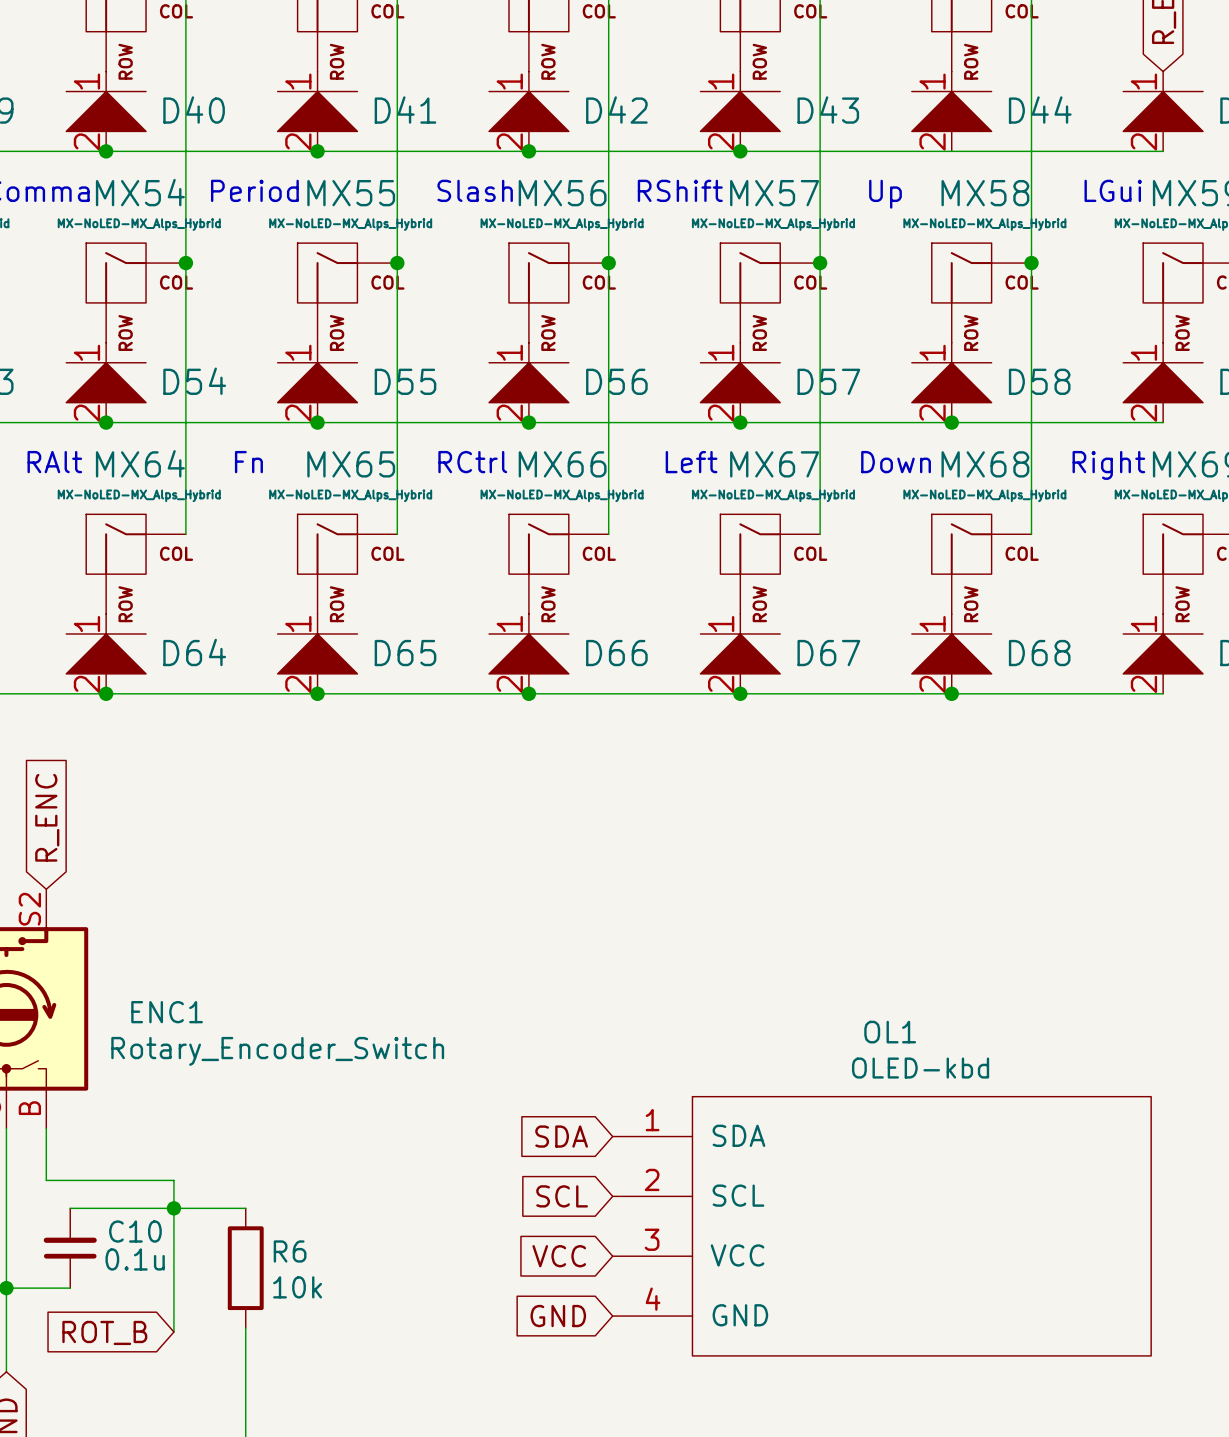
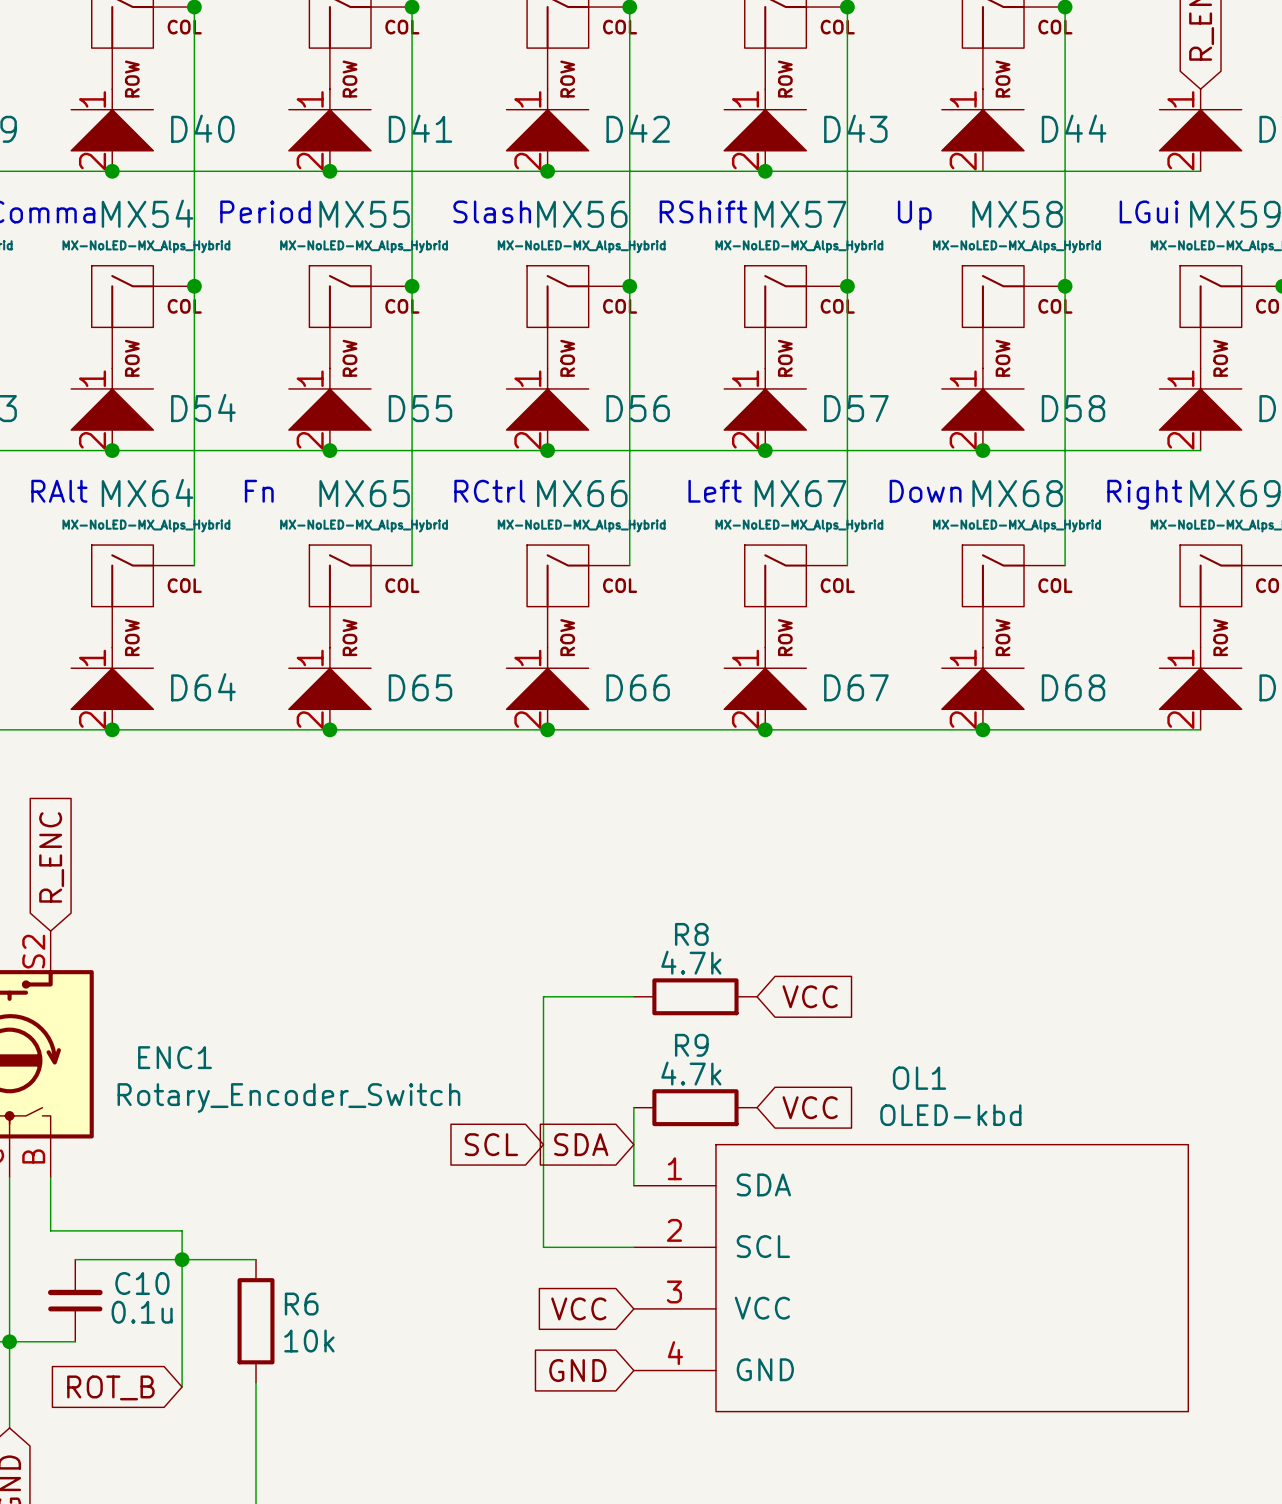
wire: none -> (633, 996) (543, 996) (543, 1247) (633, 1247)
R8: none -> 4.7k (695, 996)
global label: none -> VCC (810, 996)
wire: none -> (633, 1107) (633, 1185)
R9: none -> 4.7k (695, 1107)
global label: none -> VCC (810, 1107)
global label position: SDA (561, 1136) -> SDA (581, 1144)
global label position: SCL (562, 1196) -> SCL (491, 1144)

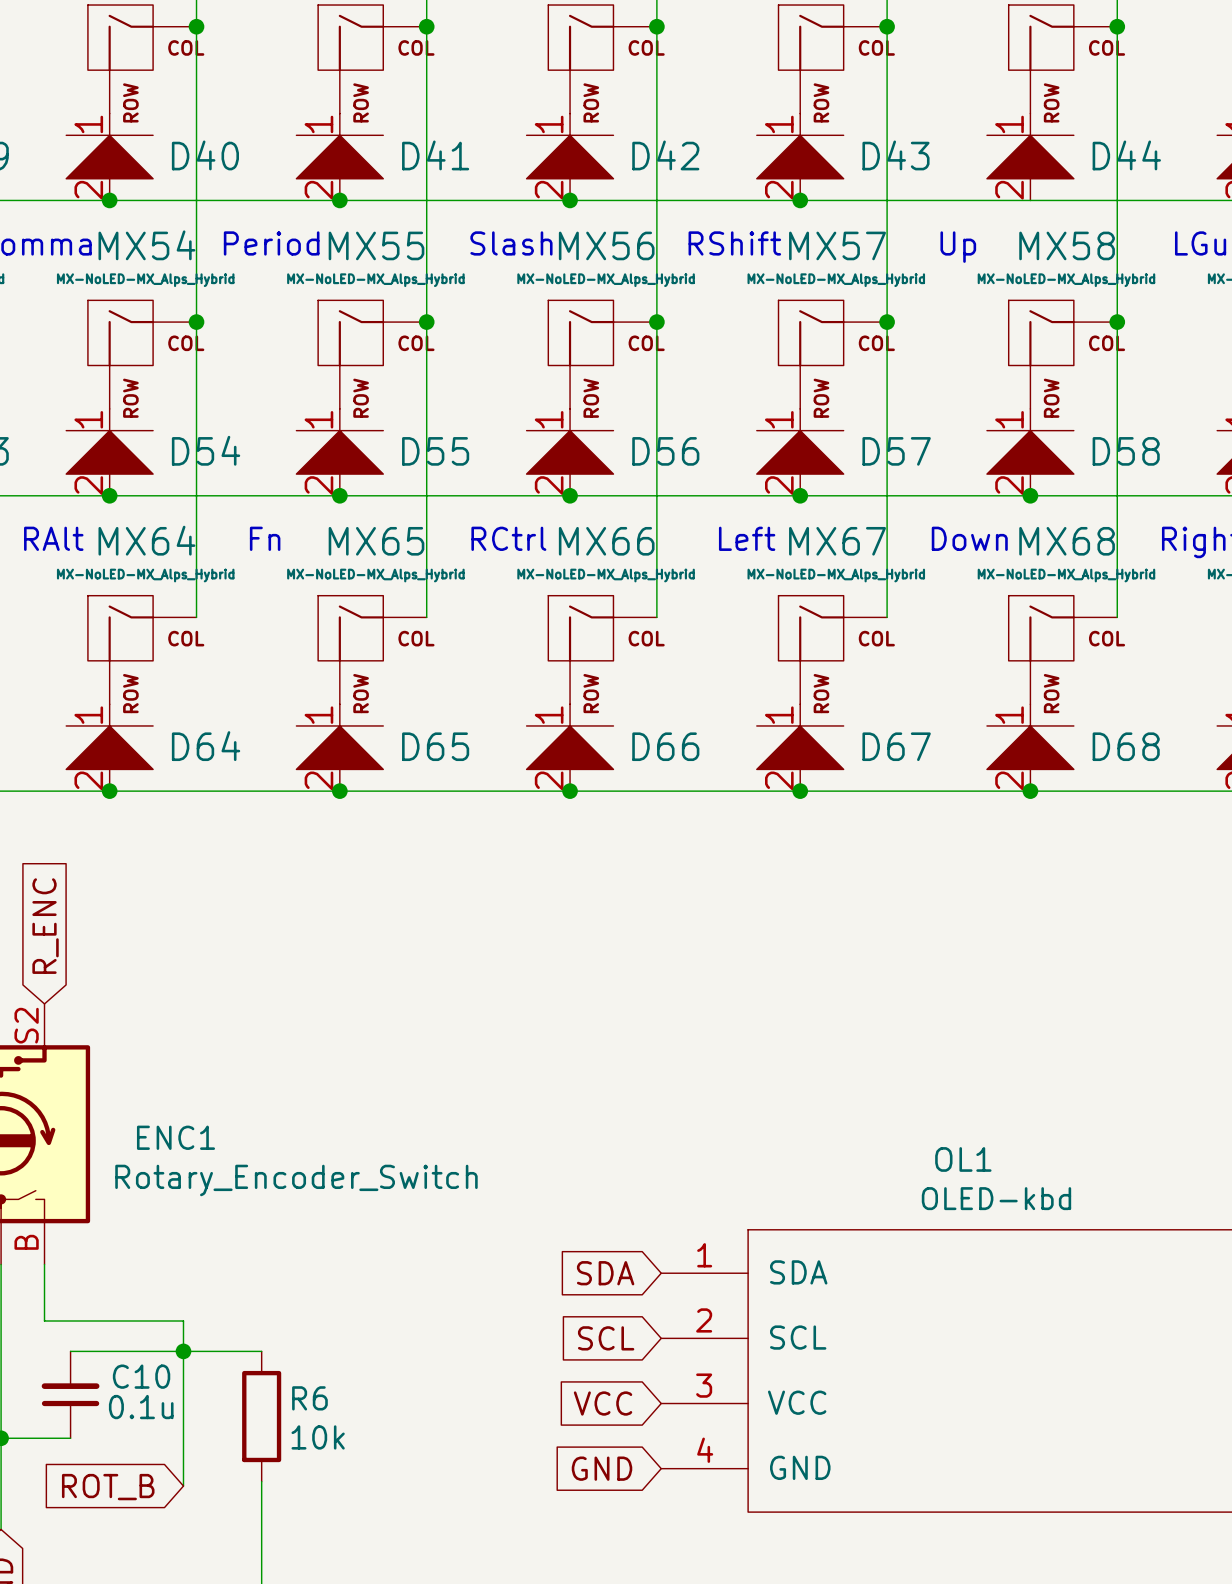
wire: (633, 996) (543, 996) (543, 1247) (633, 1247) -> none
R8: 4.7k (695, 996) -> none
global label: VCC (810, 996) -> none
wire: (633, 1107) (633, 1185) -> none
R9: 4.7k (695, 1107) -> none
global label: VCC (810, 1107) -> none
global label position: SCL (491, 1144) -> SCL (606, 1338)
global label position: SDA (581, 1144) -> SDA (605, 1273)

